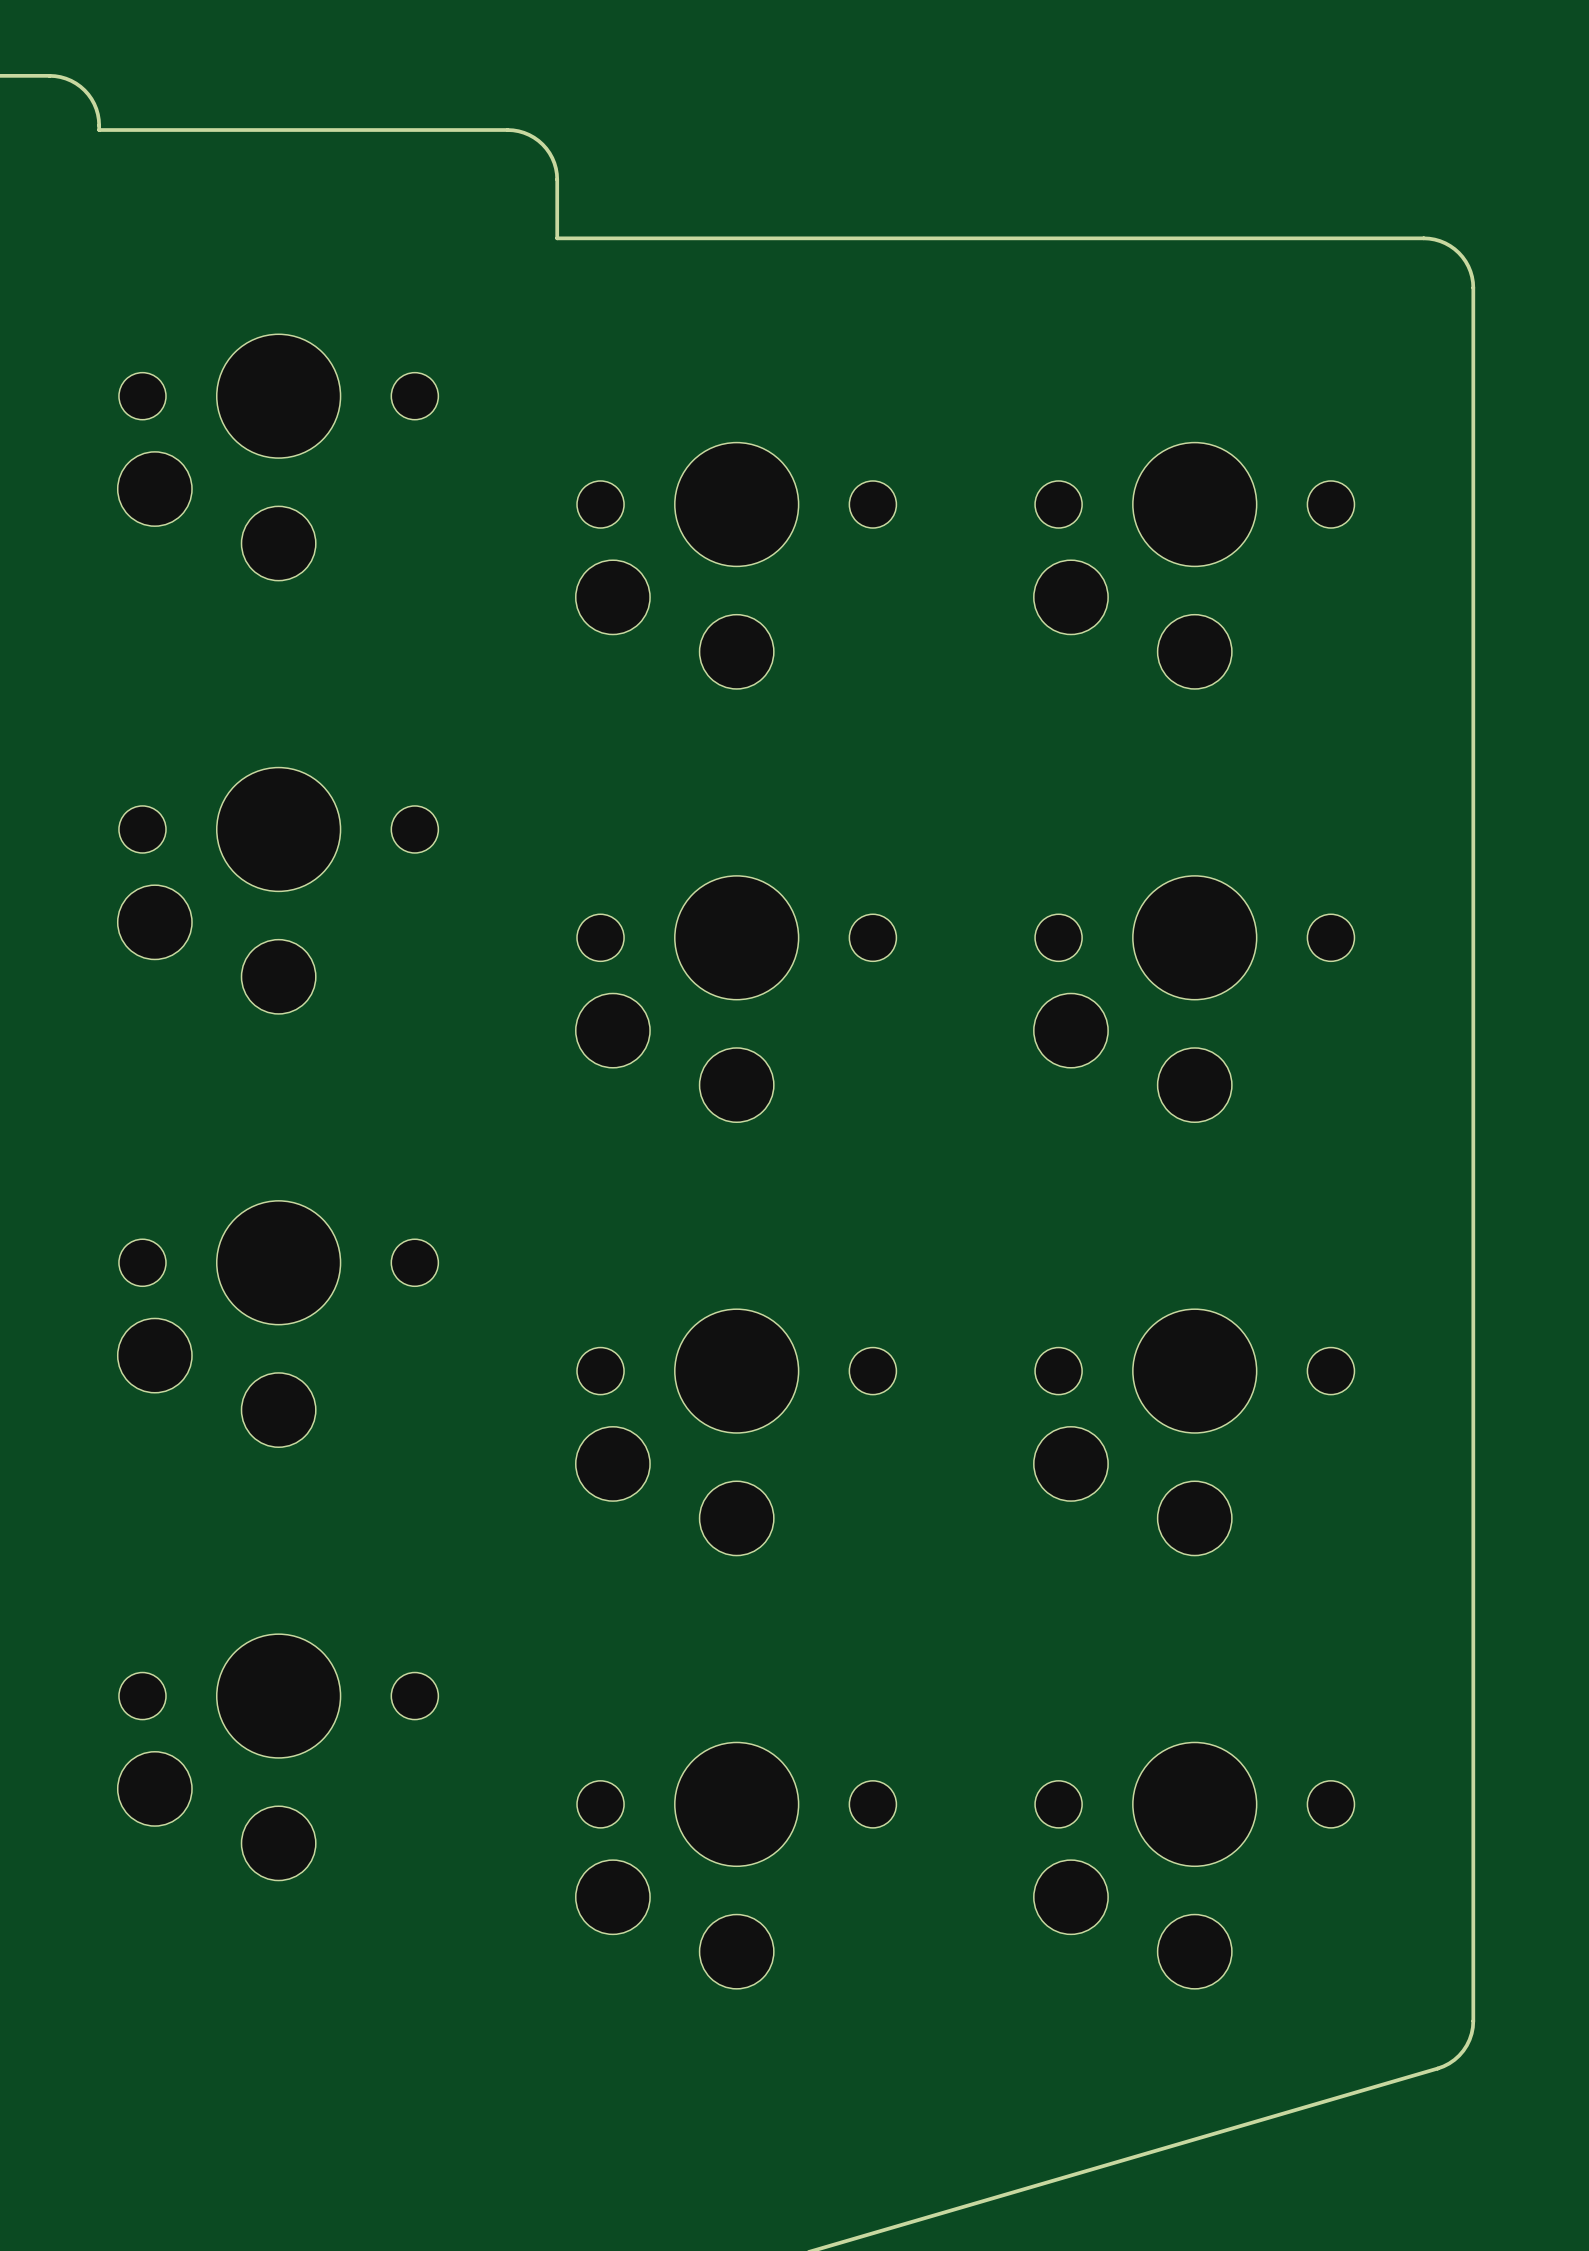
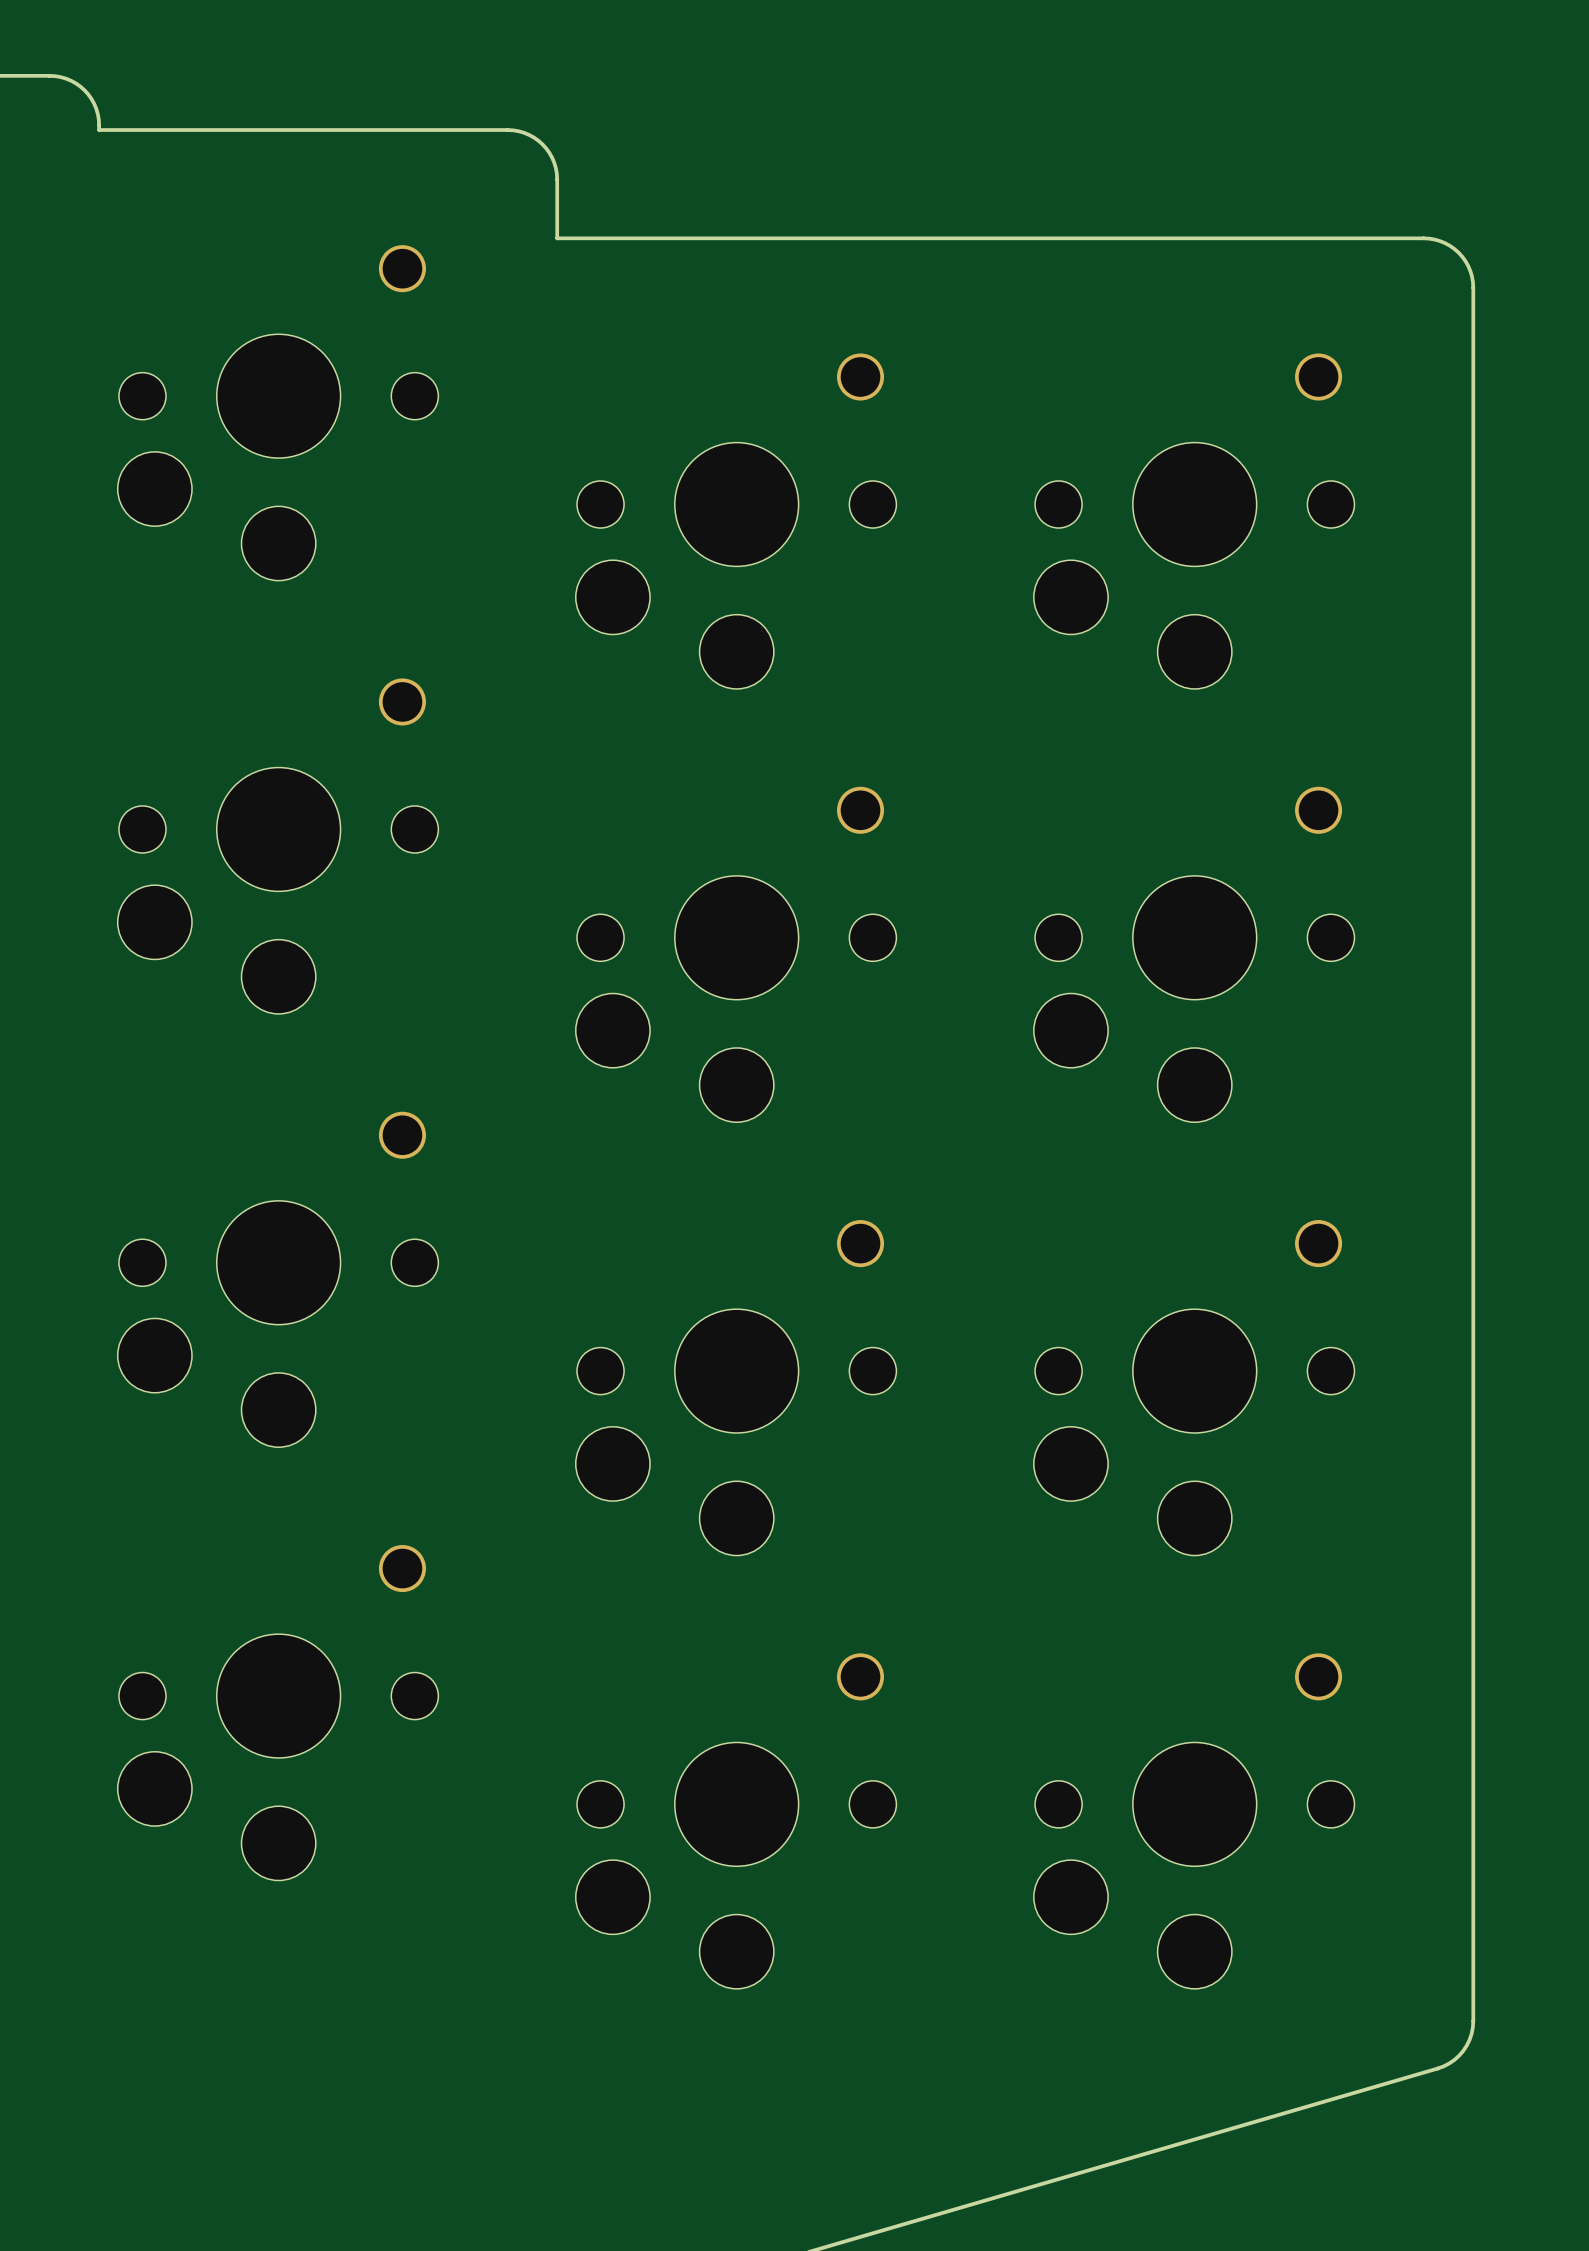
part: none -> (278, 412)
part: none -> (736, 521)
part: none -> (1194, 521)
part: none -> (278, 846)
part: none -> (736, 954)
part: none -> (1194, 954)
part: none -> (278, 1279)
part: none -> (736, 1387)
part: none -> (1194, 1387)
part: none -> (278, 1712)
part: none -> (736, 1821)
part: none -> (1194, 1821)

